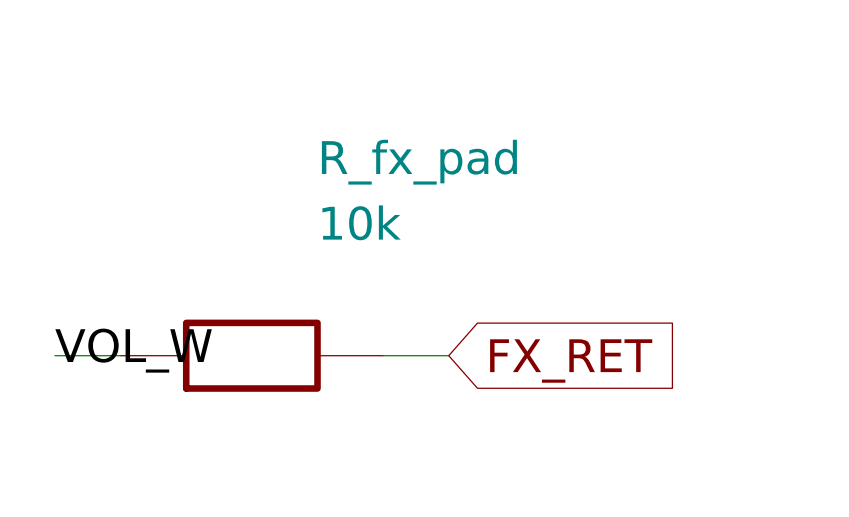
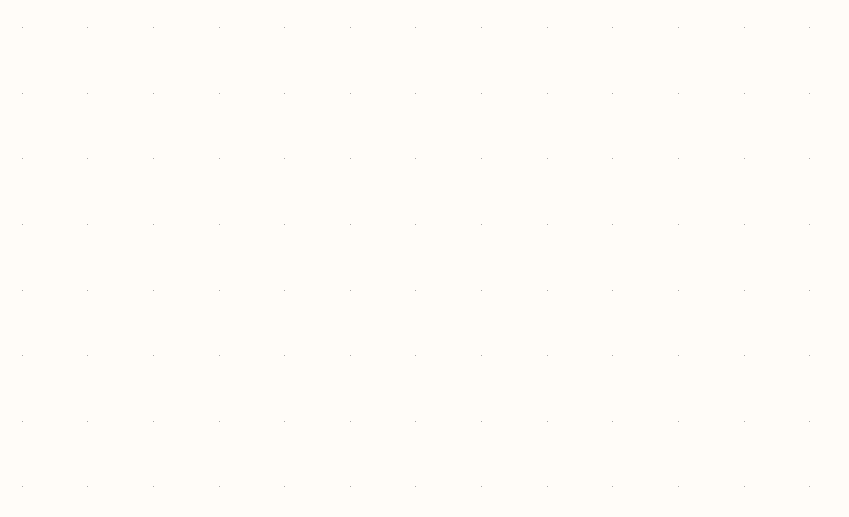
label: VOL_W (133, 350) -> none
wire: (54, 355) (120, 355) -> none
R_fx_pad: 10k (251, 355) -> none
wire: (383, 355) (448, 355) -> none
global label: FX_RET (571, 361) -> none

